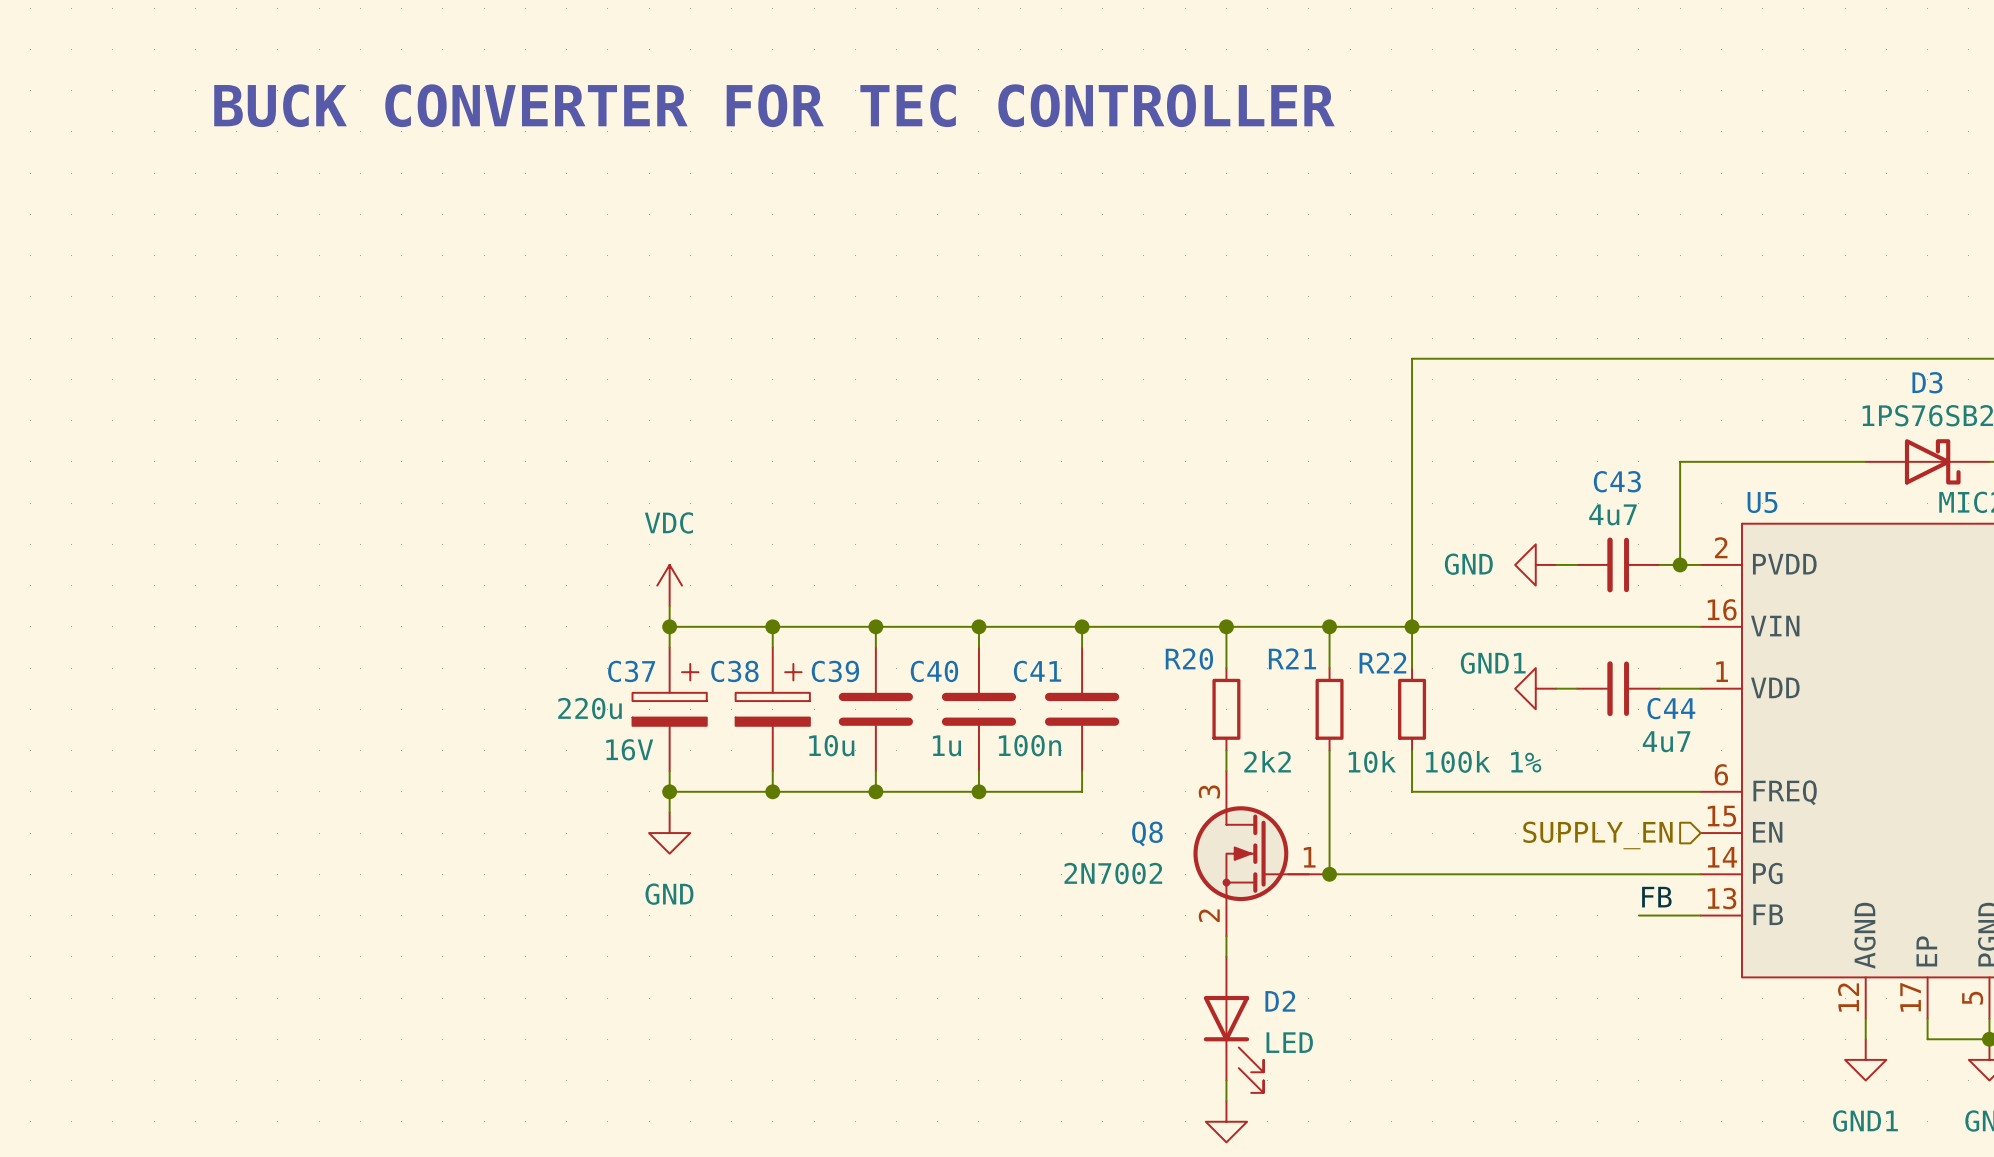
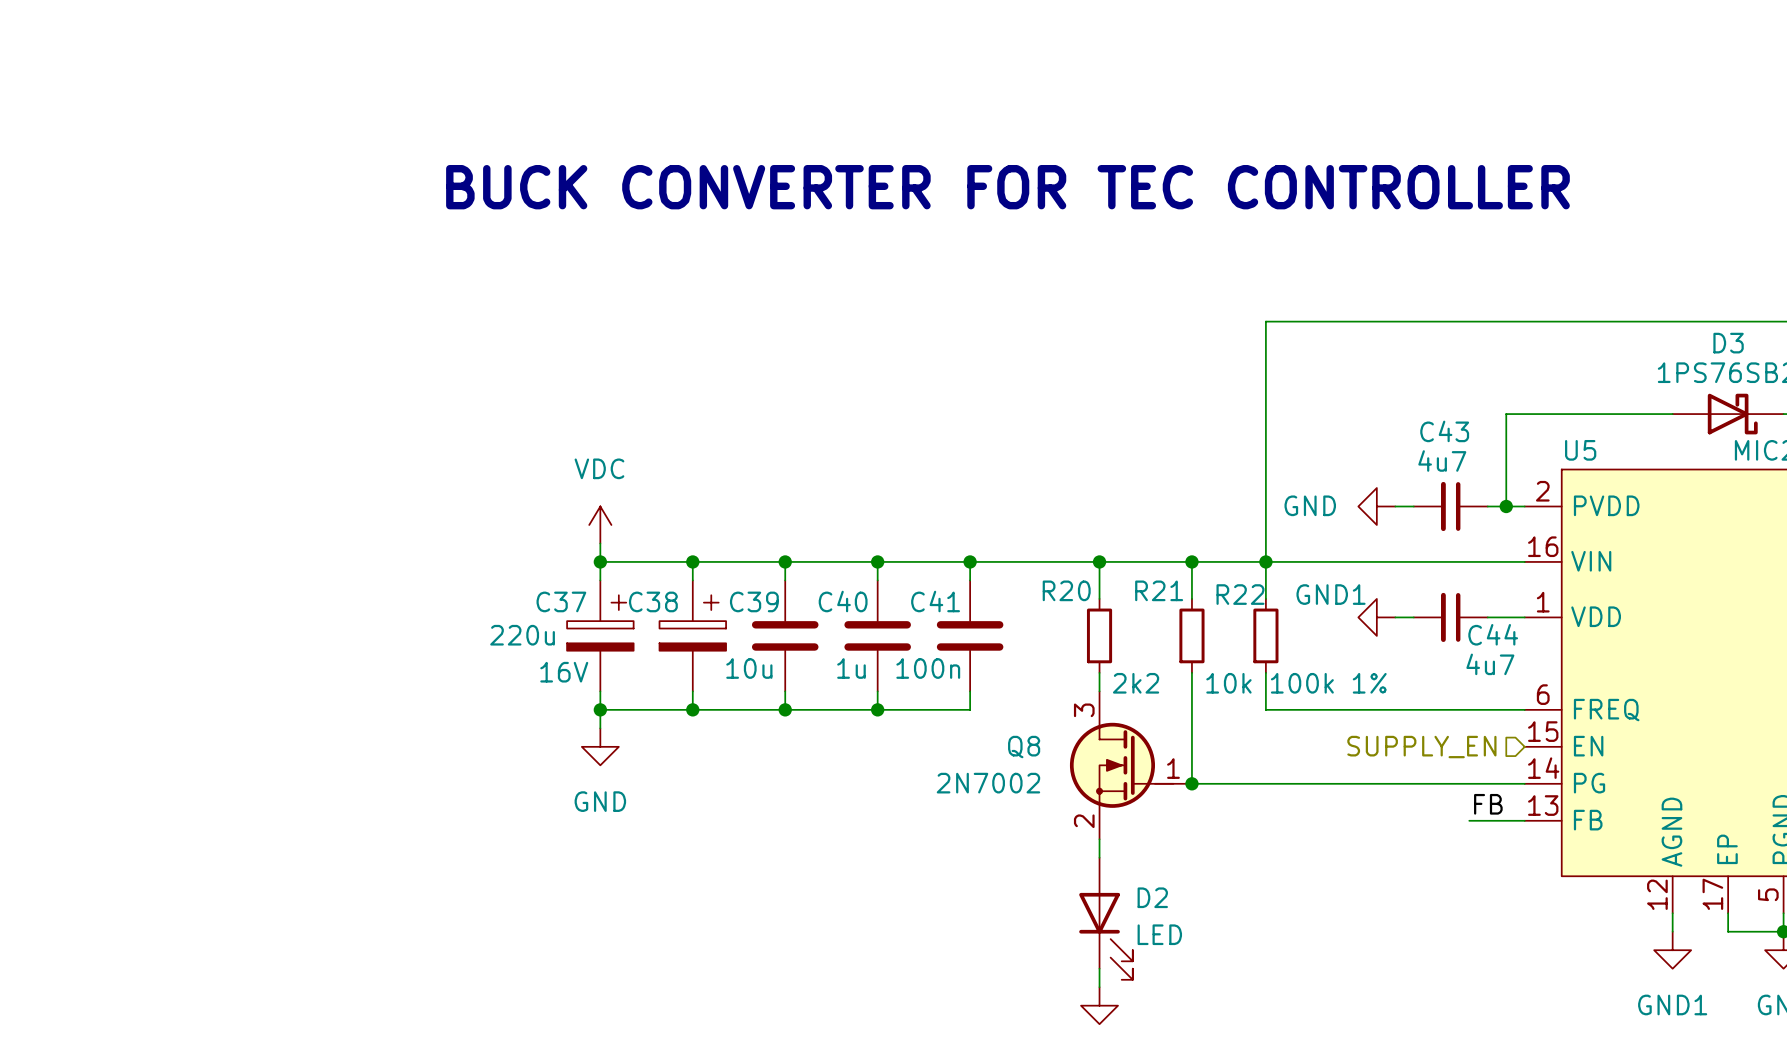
text position: BUCK CONVERTER FOR TEC CONTROLLER (774, 105) -> BUCK CONVERTER FOR TEC CONTROLLER (1007, 187)

